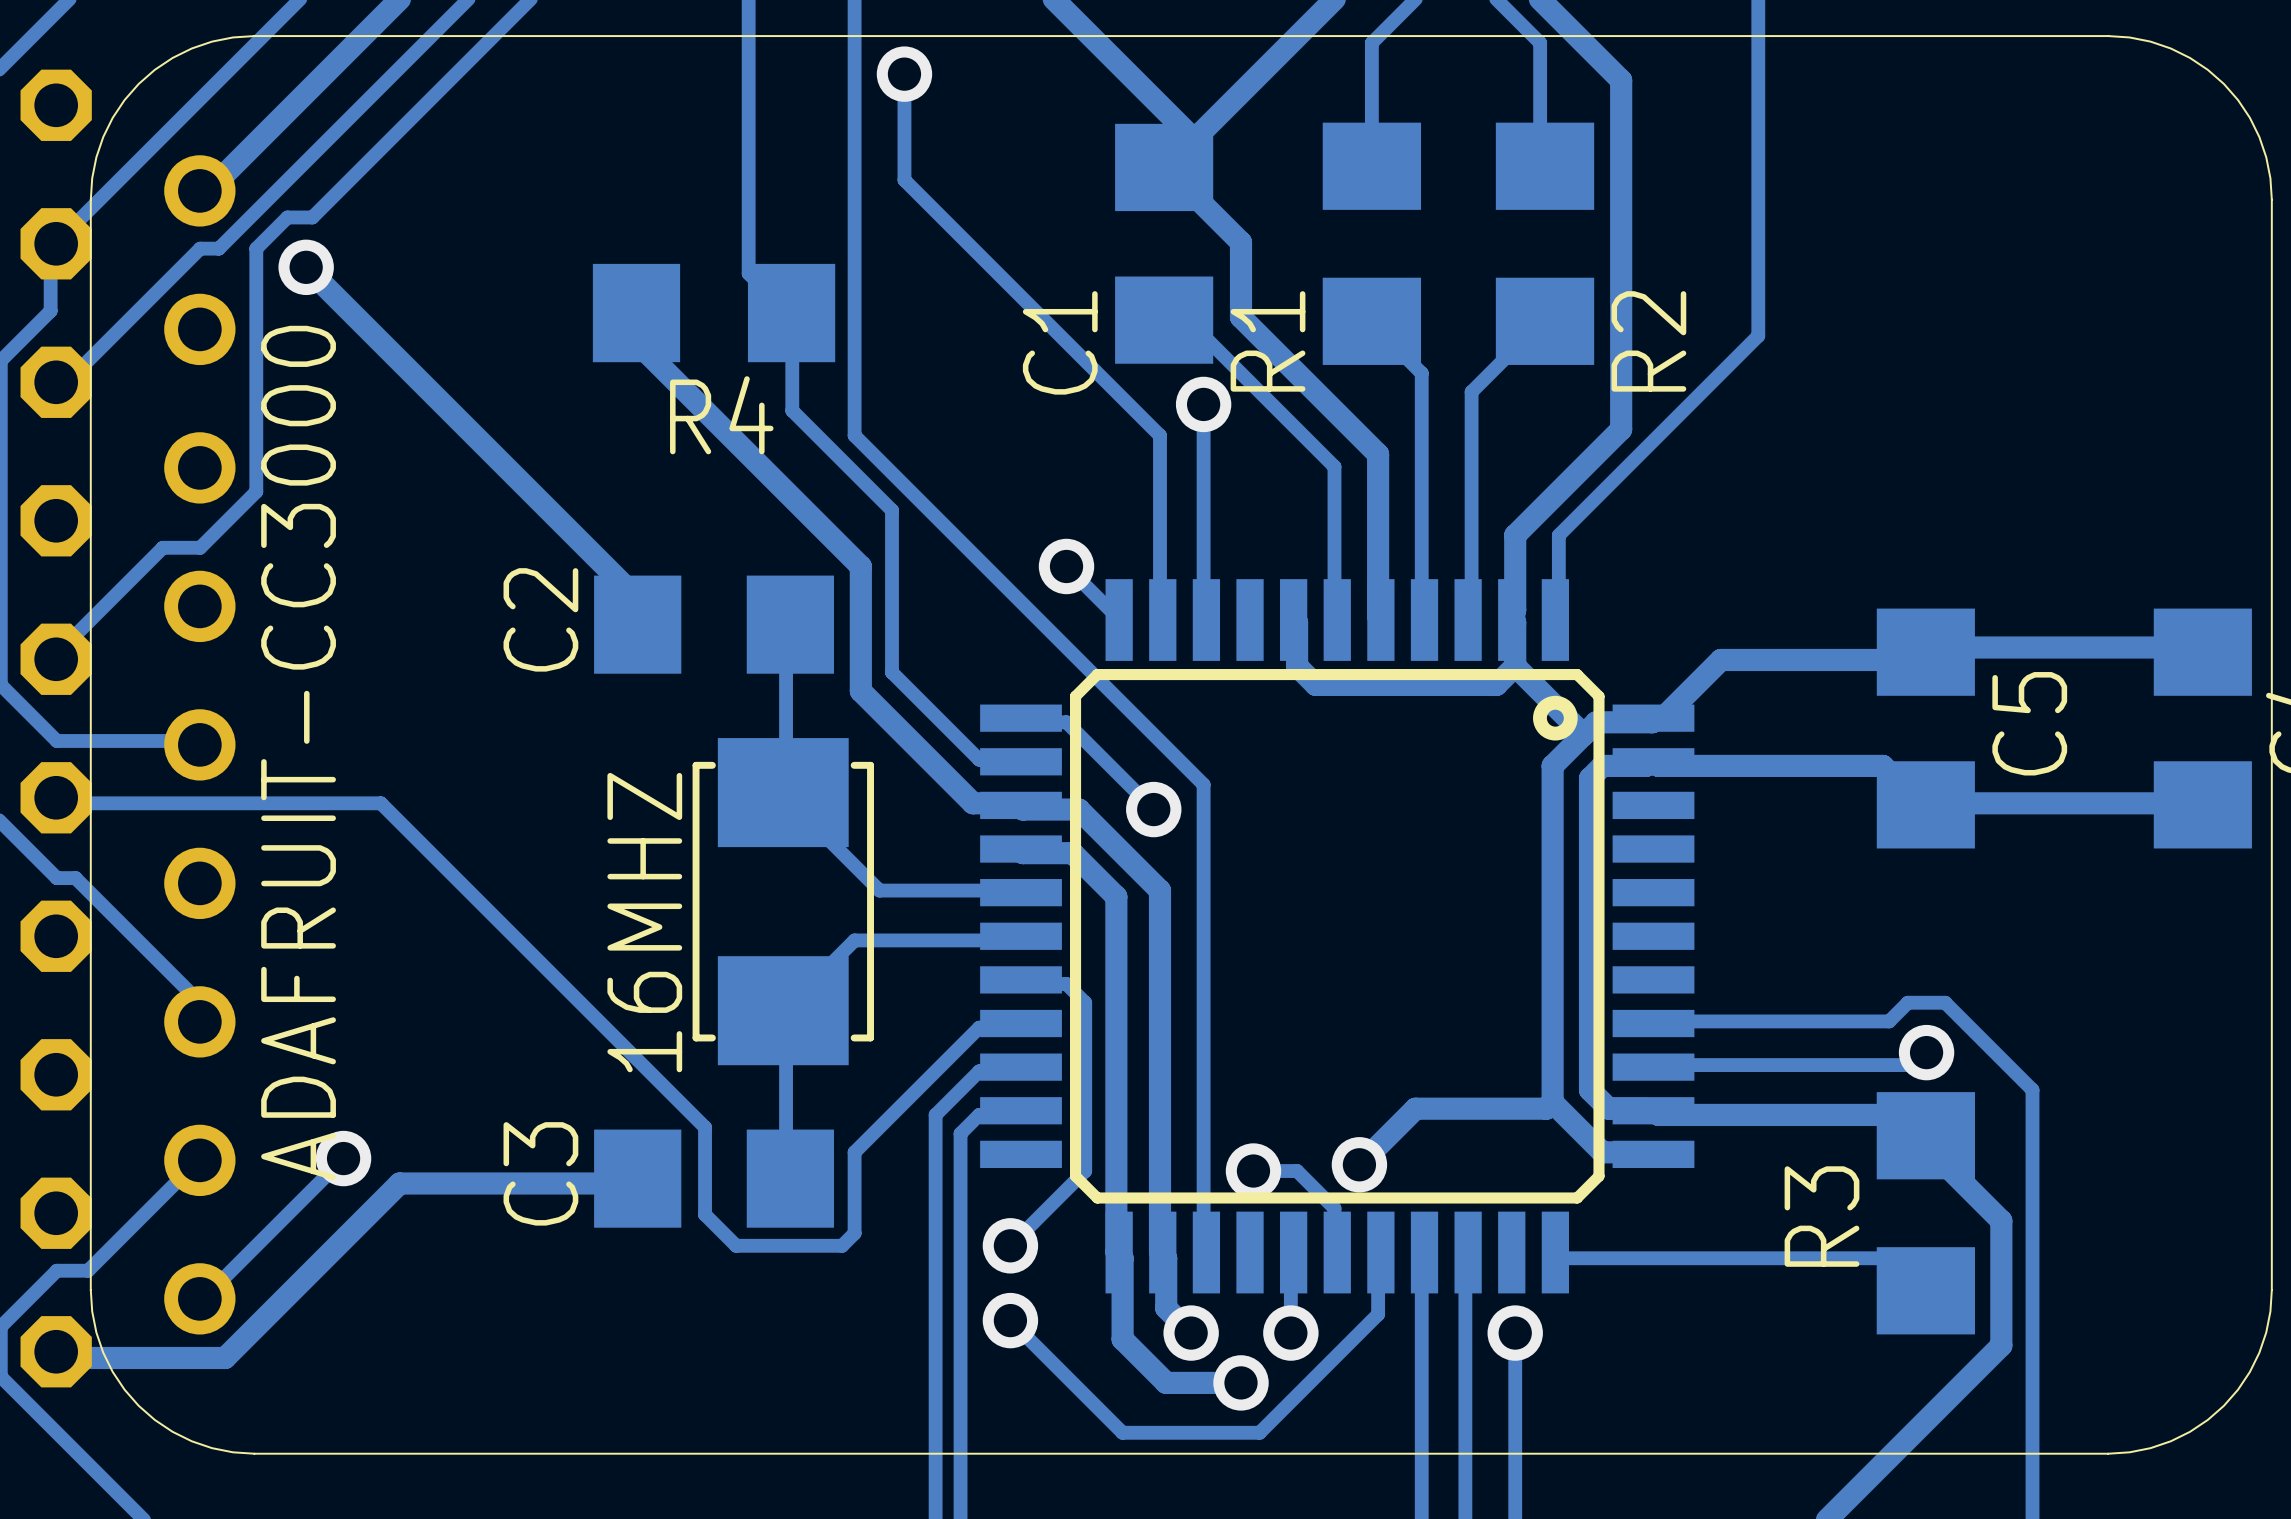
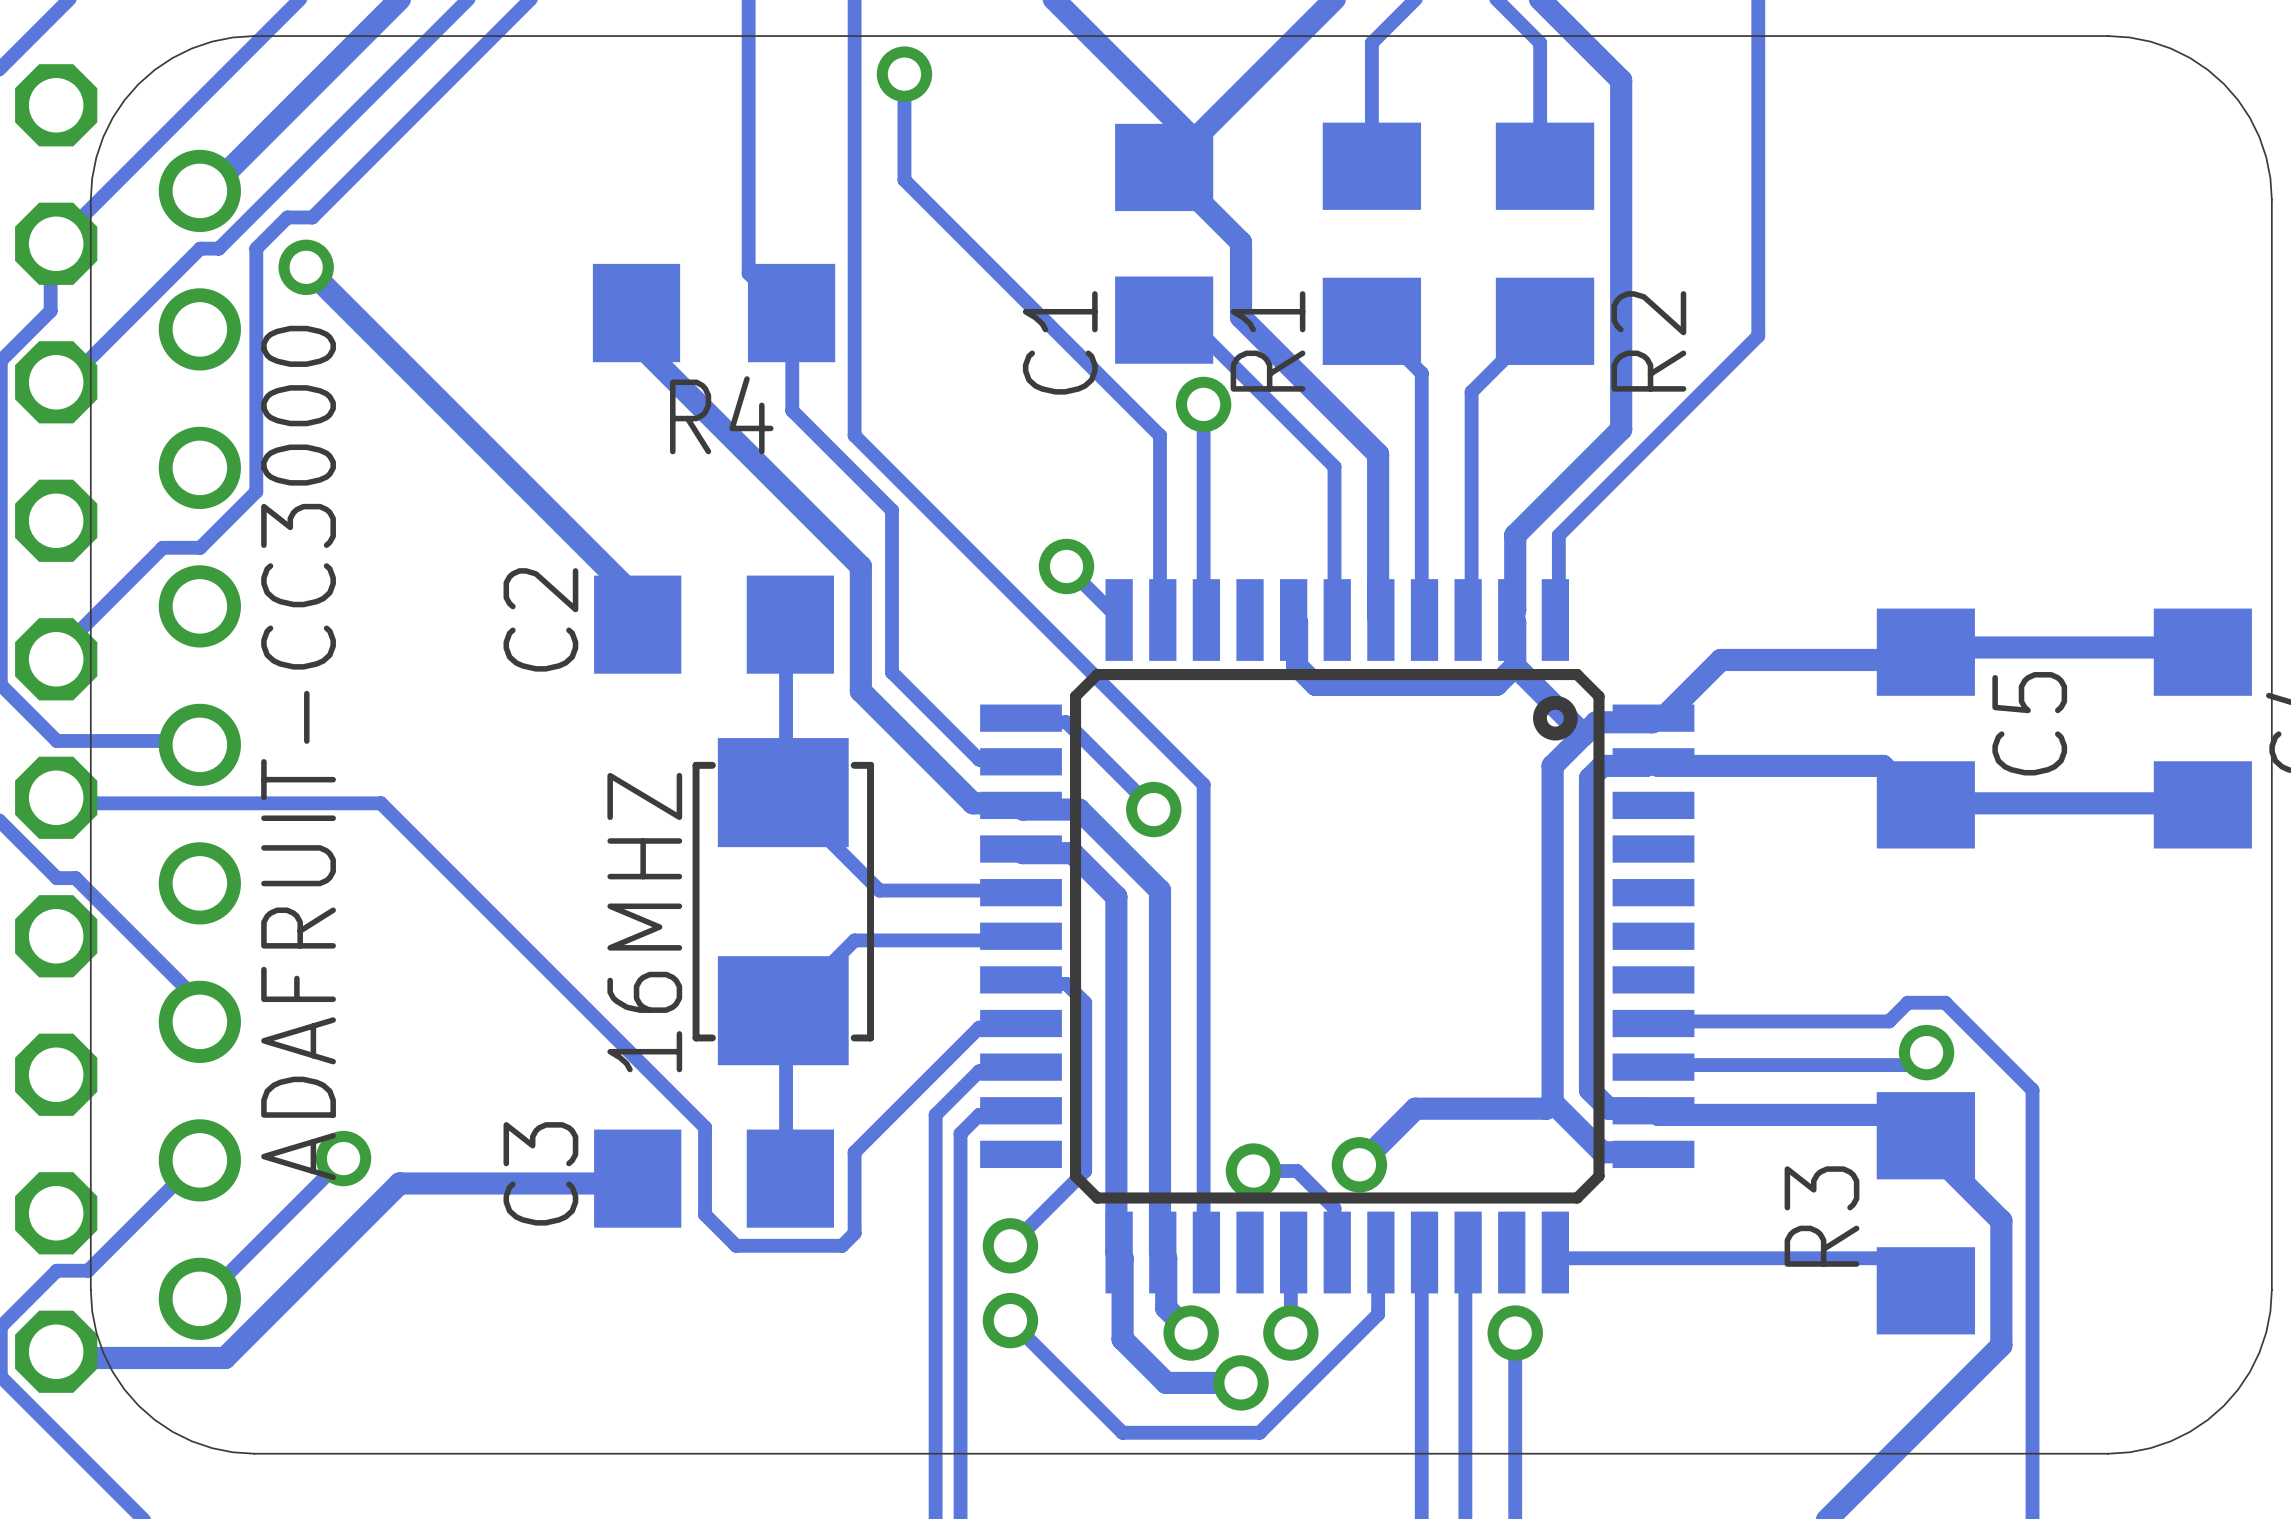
part footprint: [90, 36, 2272, 1454] -> [90, 36, 2272, 1454]
part footprint: [20, 69, 92, 1388] -> [15, 64, 98, 1393]

